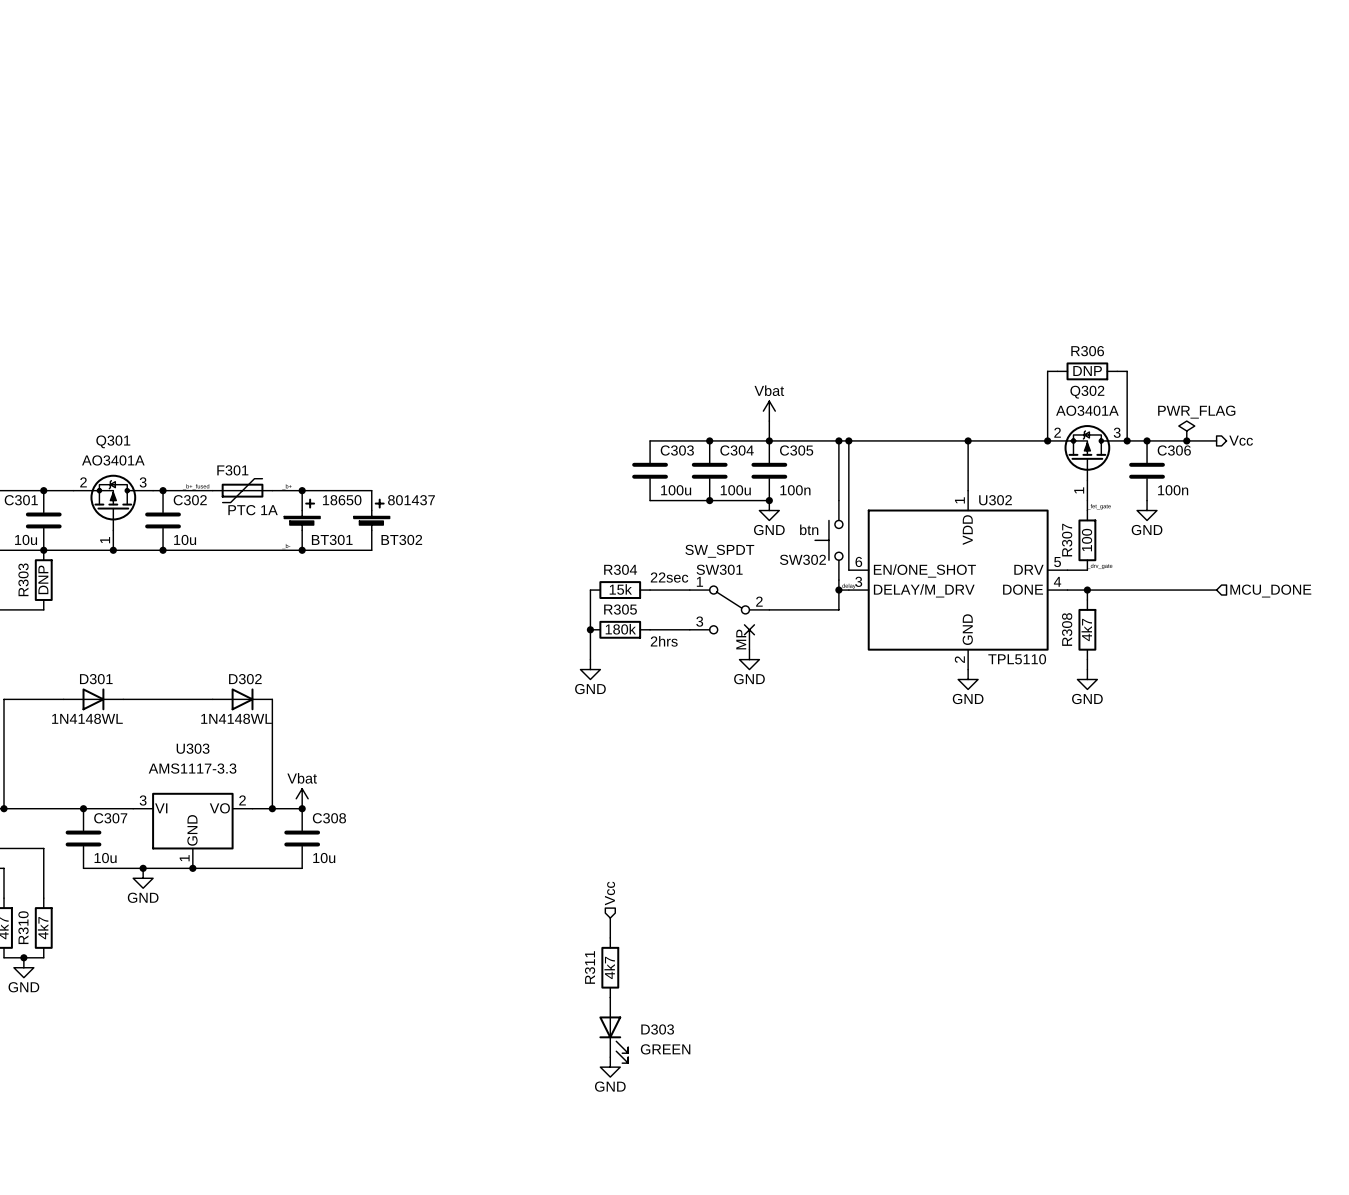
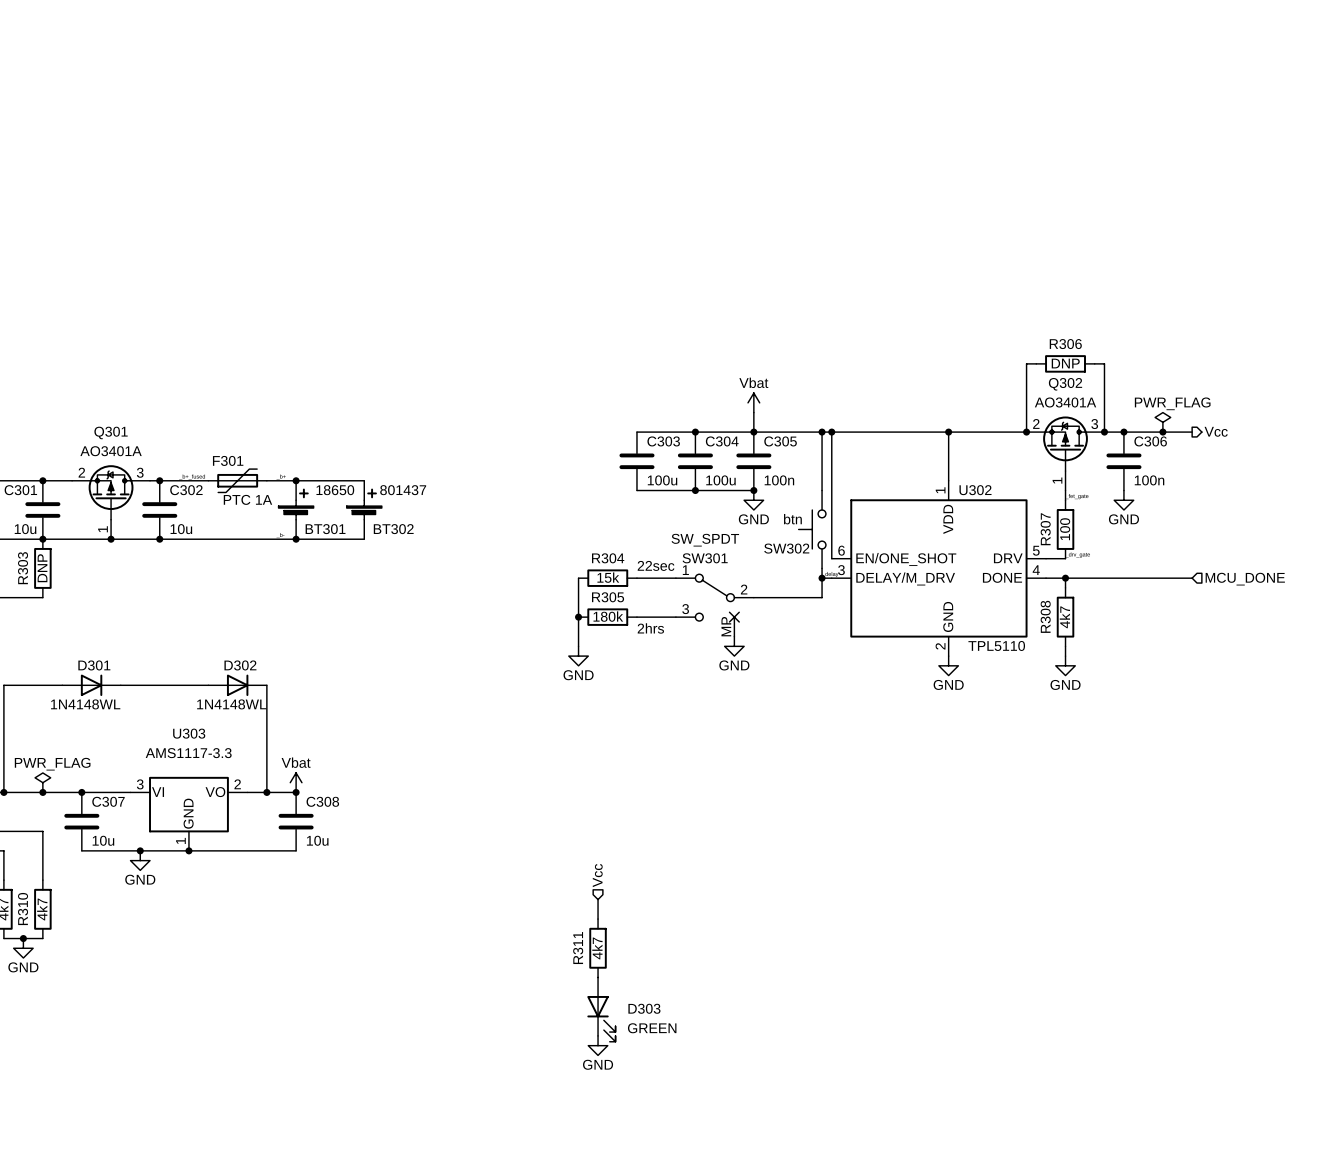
power symbol: none -> PWR_FLAG (42, 782)
junction: none -> (42, 792)

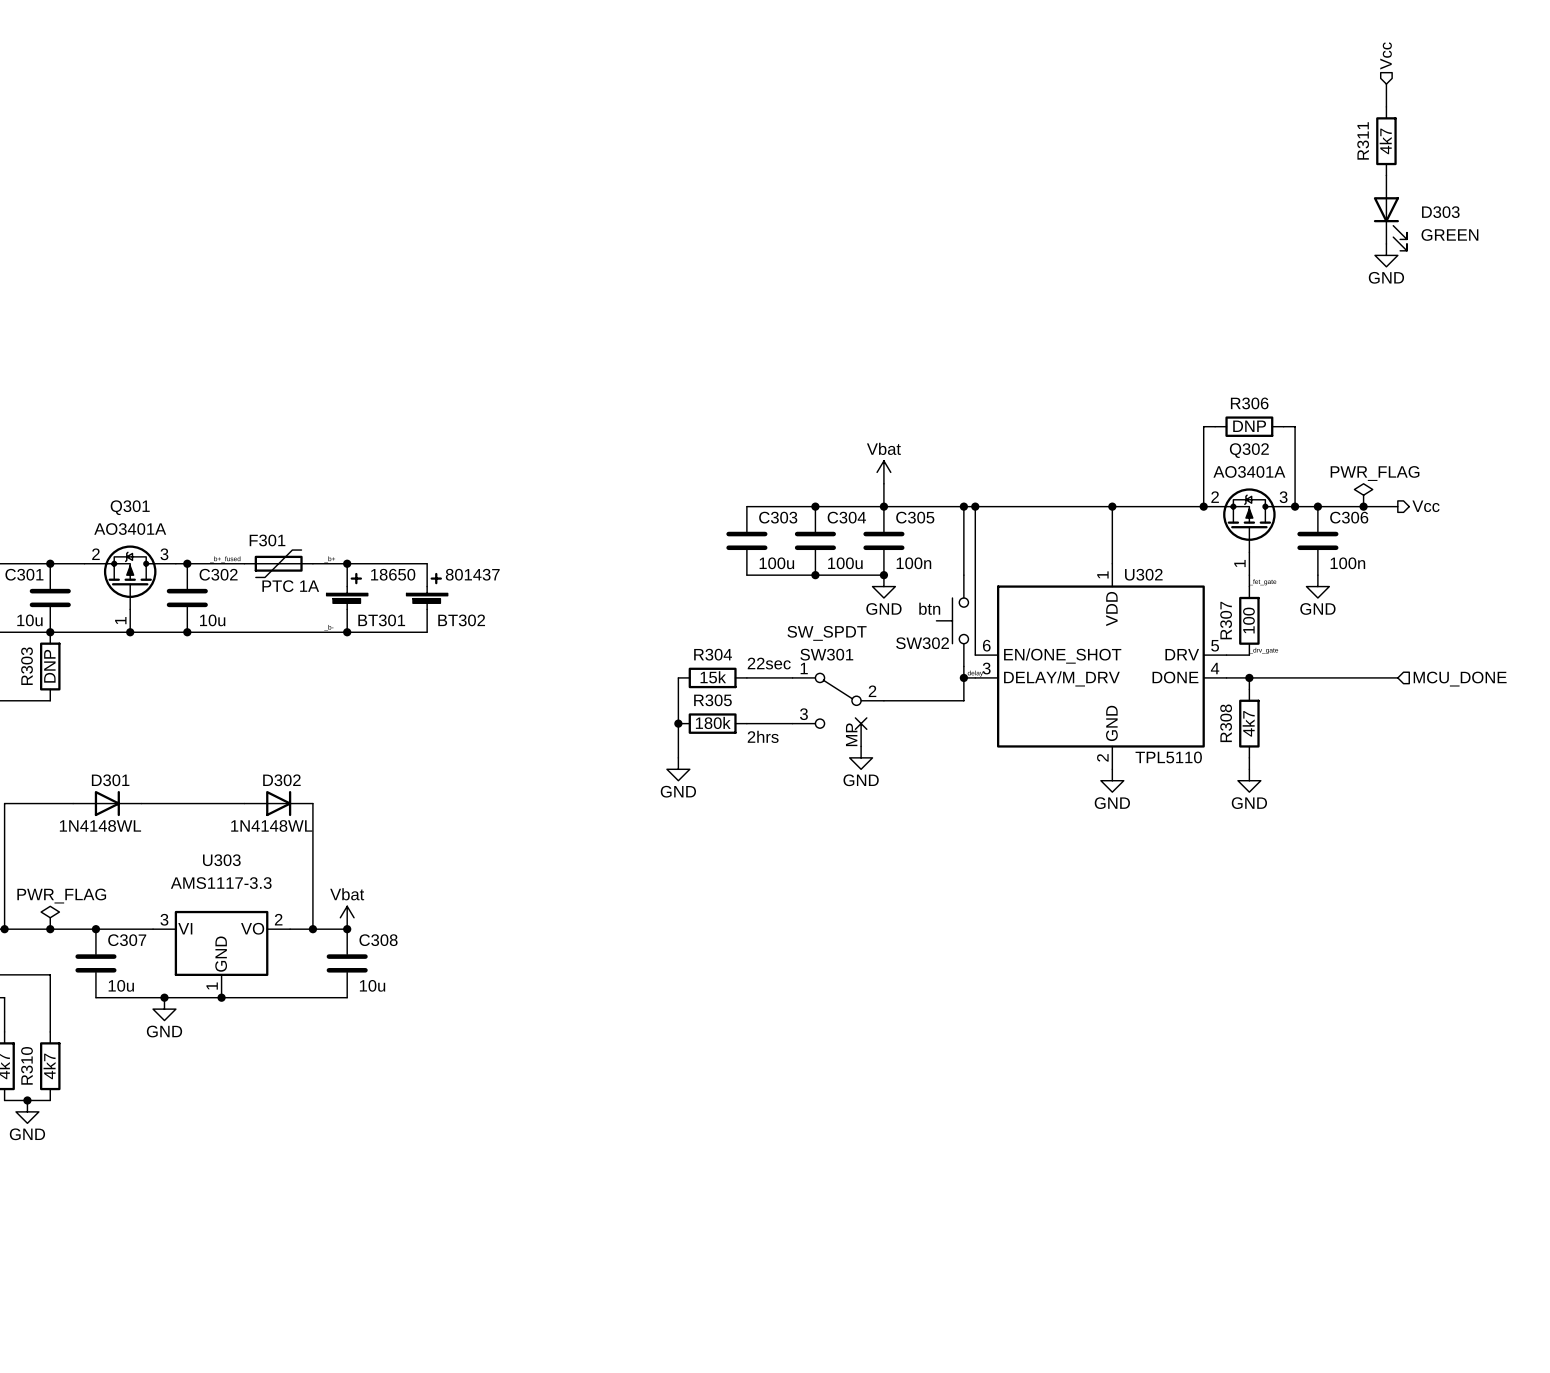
hierarchical label: none -> Vcc (1386, 55)
wire: none -> (1386, 84) (1386, 106)
power symbol: none -> GND (1386, 255)
hierarchical label: Vcc (597, 875) -> none
wire: (598, 899) (598, 919) -> none
R311 position: (598, 948) -> (1386, 141)
D303 position: (601, 1009) -> (1390, 213)
power symbol: GND (598, 1045) -> none

